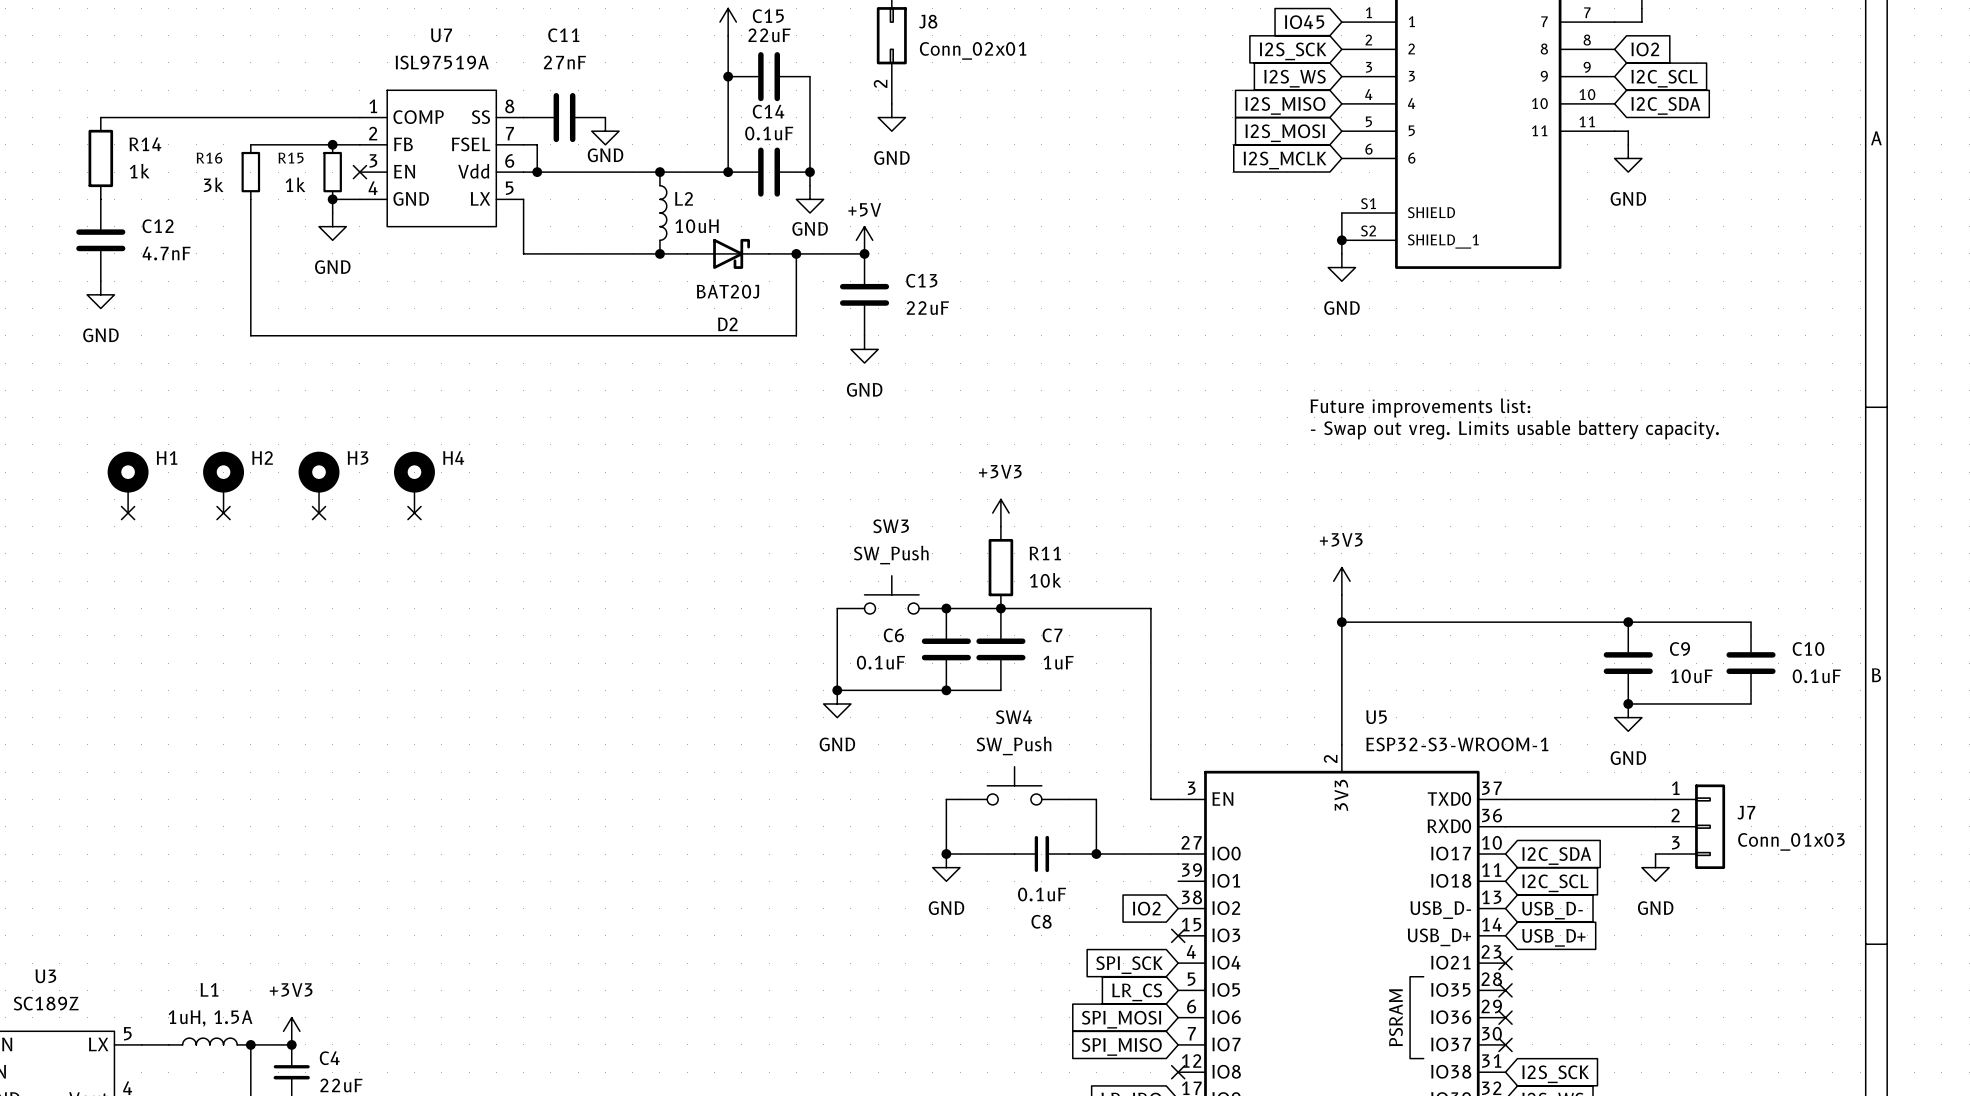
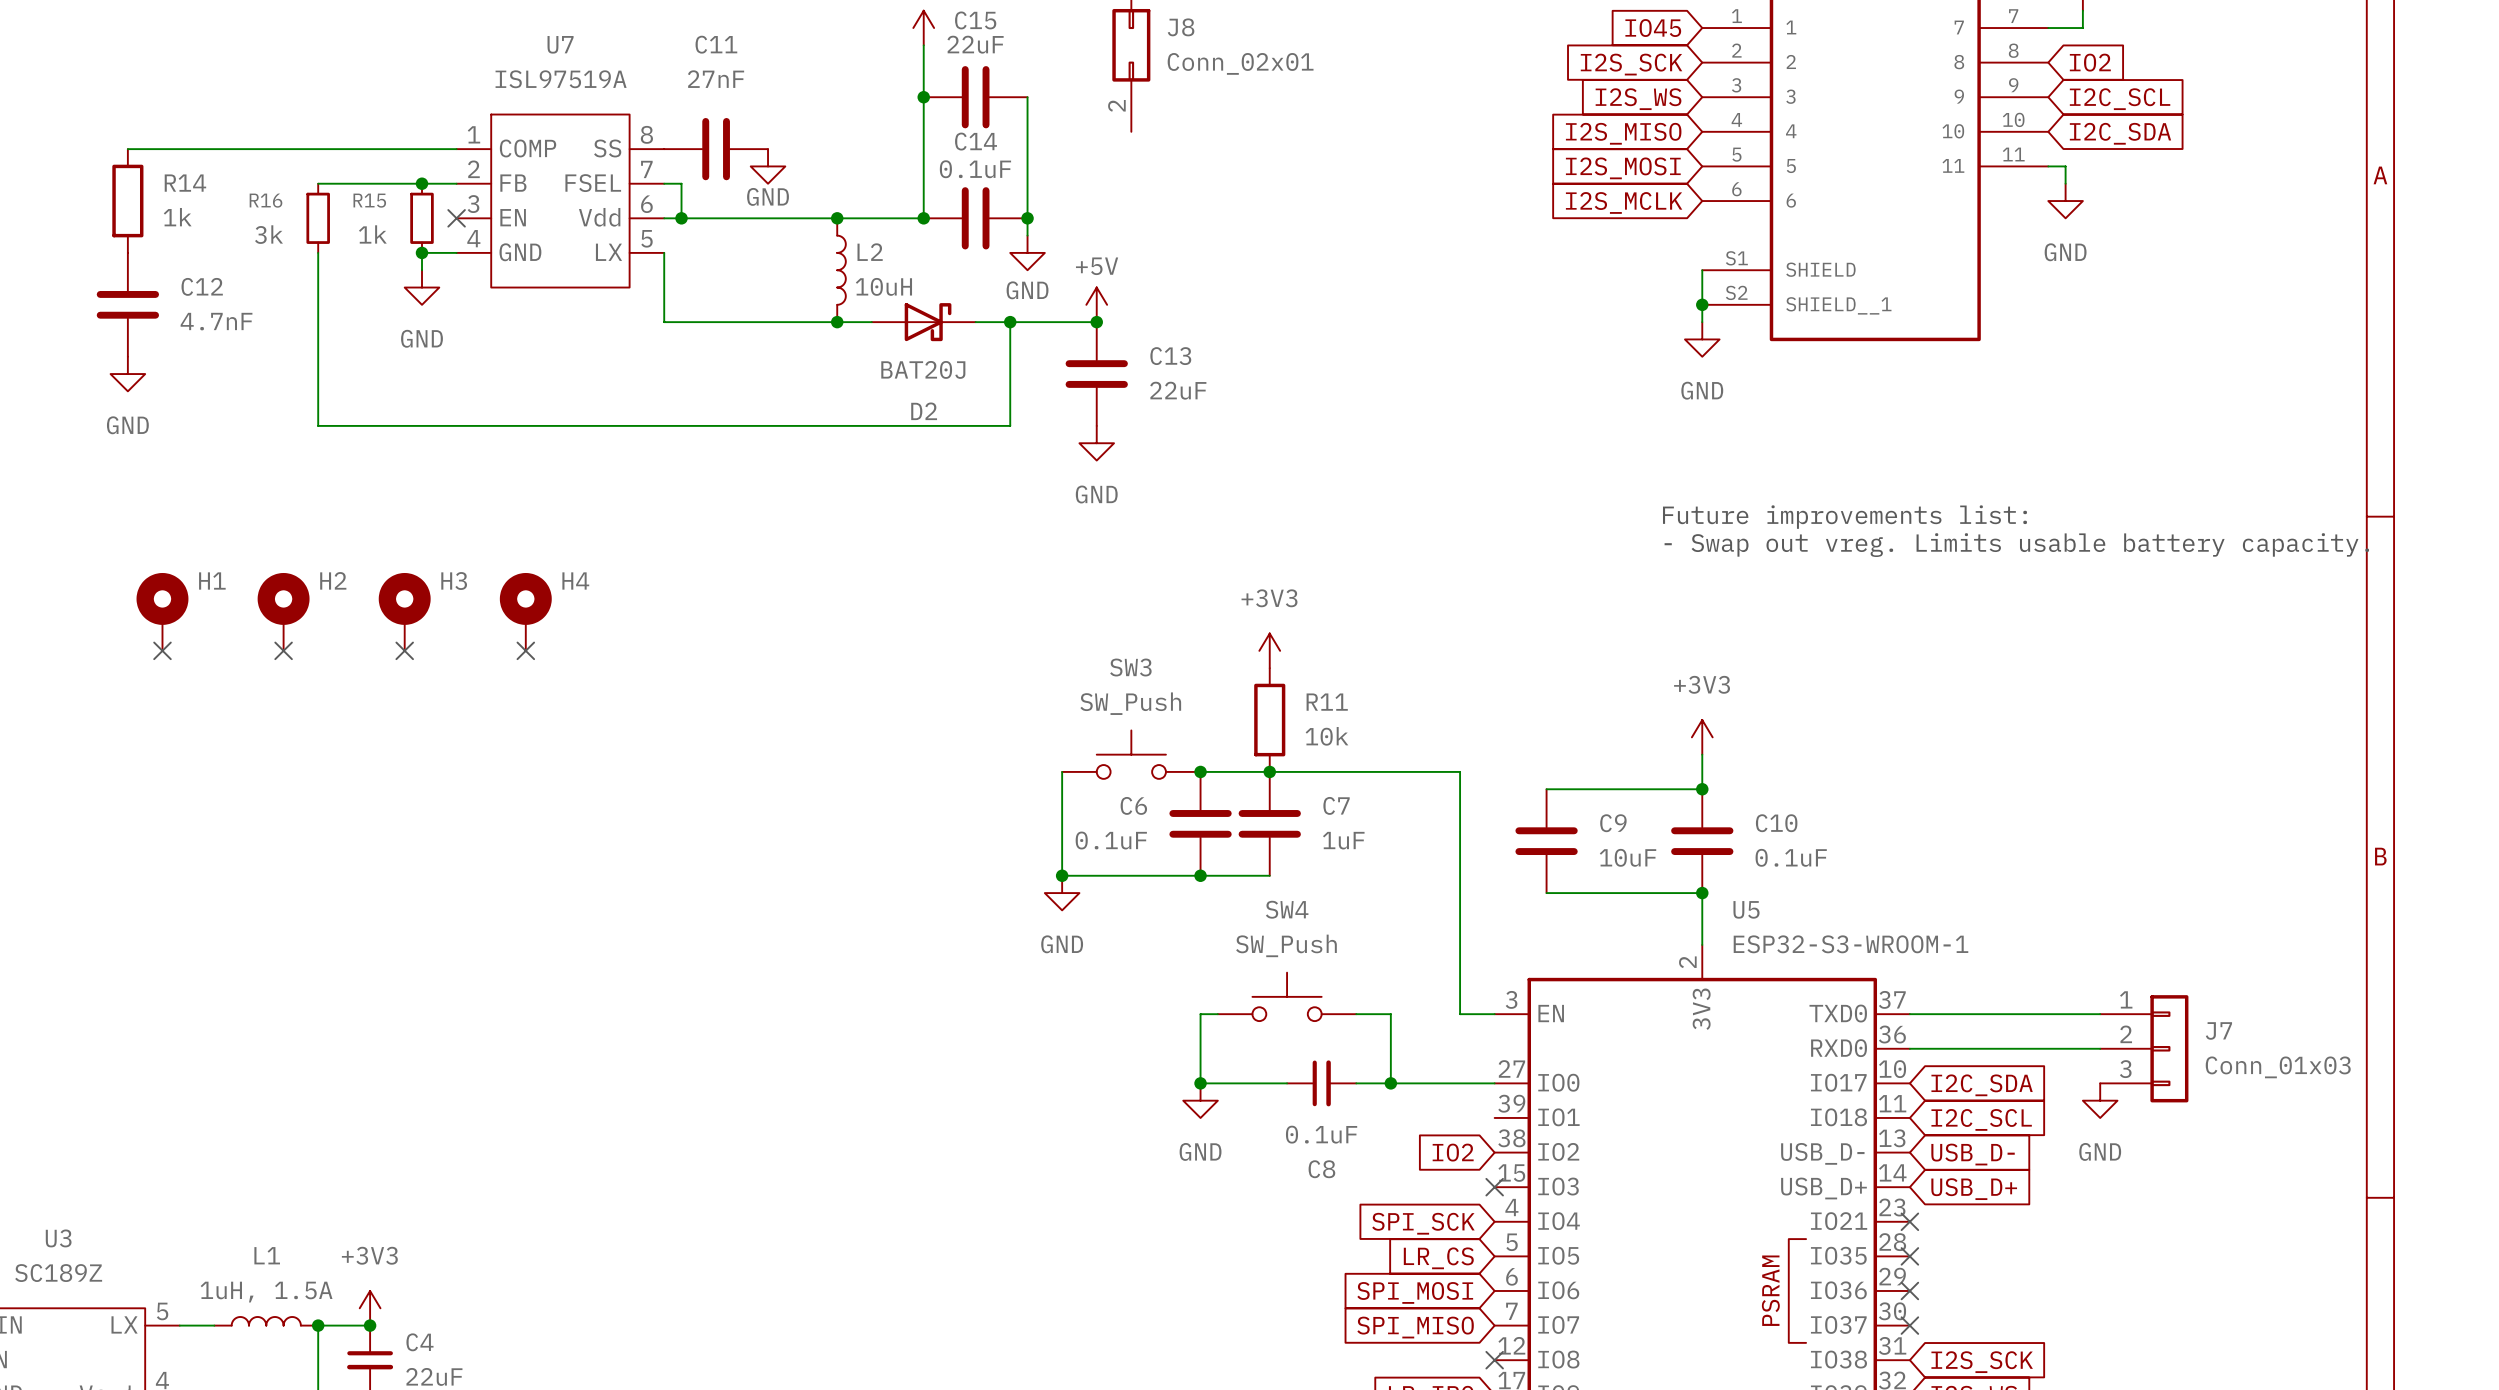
power symbol: GND (891, 117) -> none
wire: none -> (1546, 789) (1702, 789)
junction: (1628, 622) -> none
wire: (1751, 622) (1341, 622) (1341, 703) -> (1546, 893) (1702, 893)
C9 position: (1628, 663) -> (1546, 841)
C10 position: (1751, 663) -> (1702, 841)
junction: none -> (1702, 893)
wire: (1628, 703) (1751, 703) -> none
junction: (1628, 703) -> none
power symbol: GND (1628, 717) -> none

